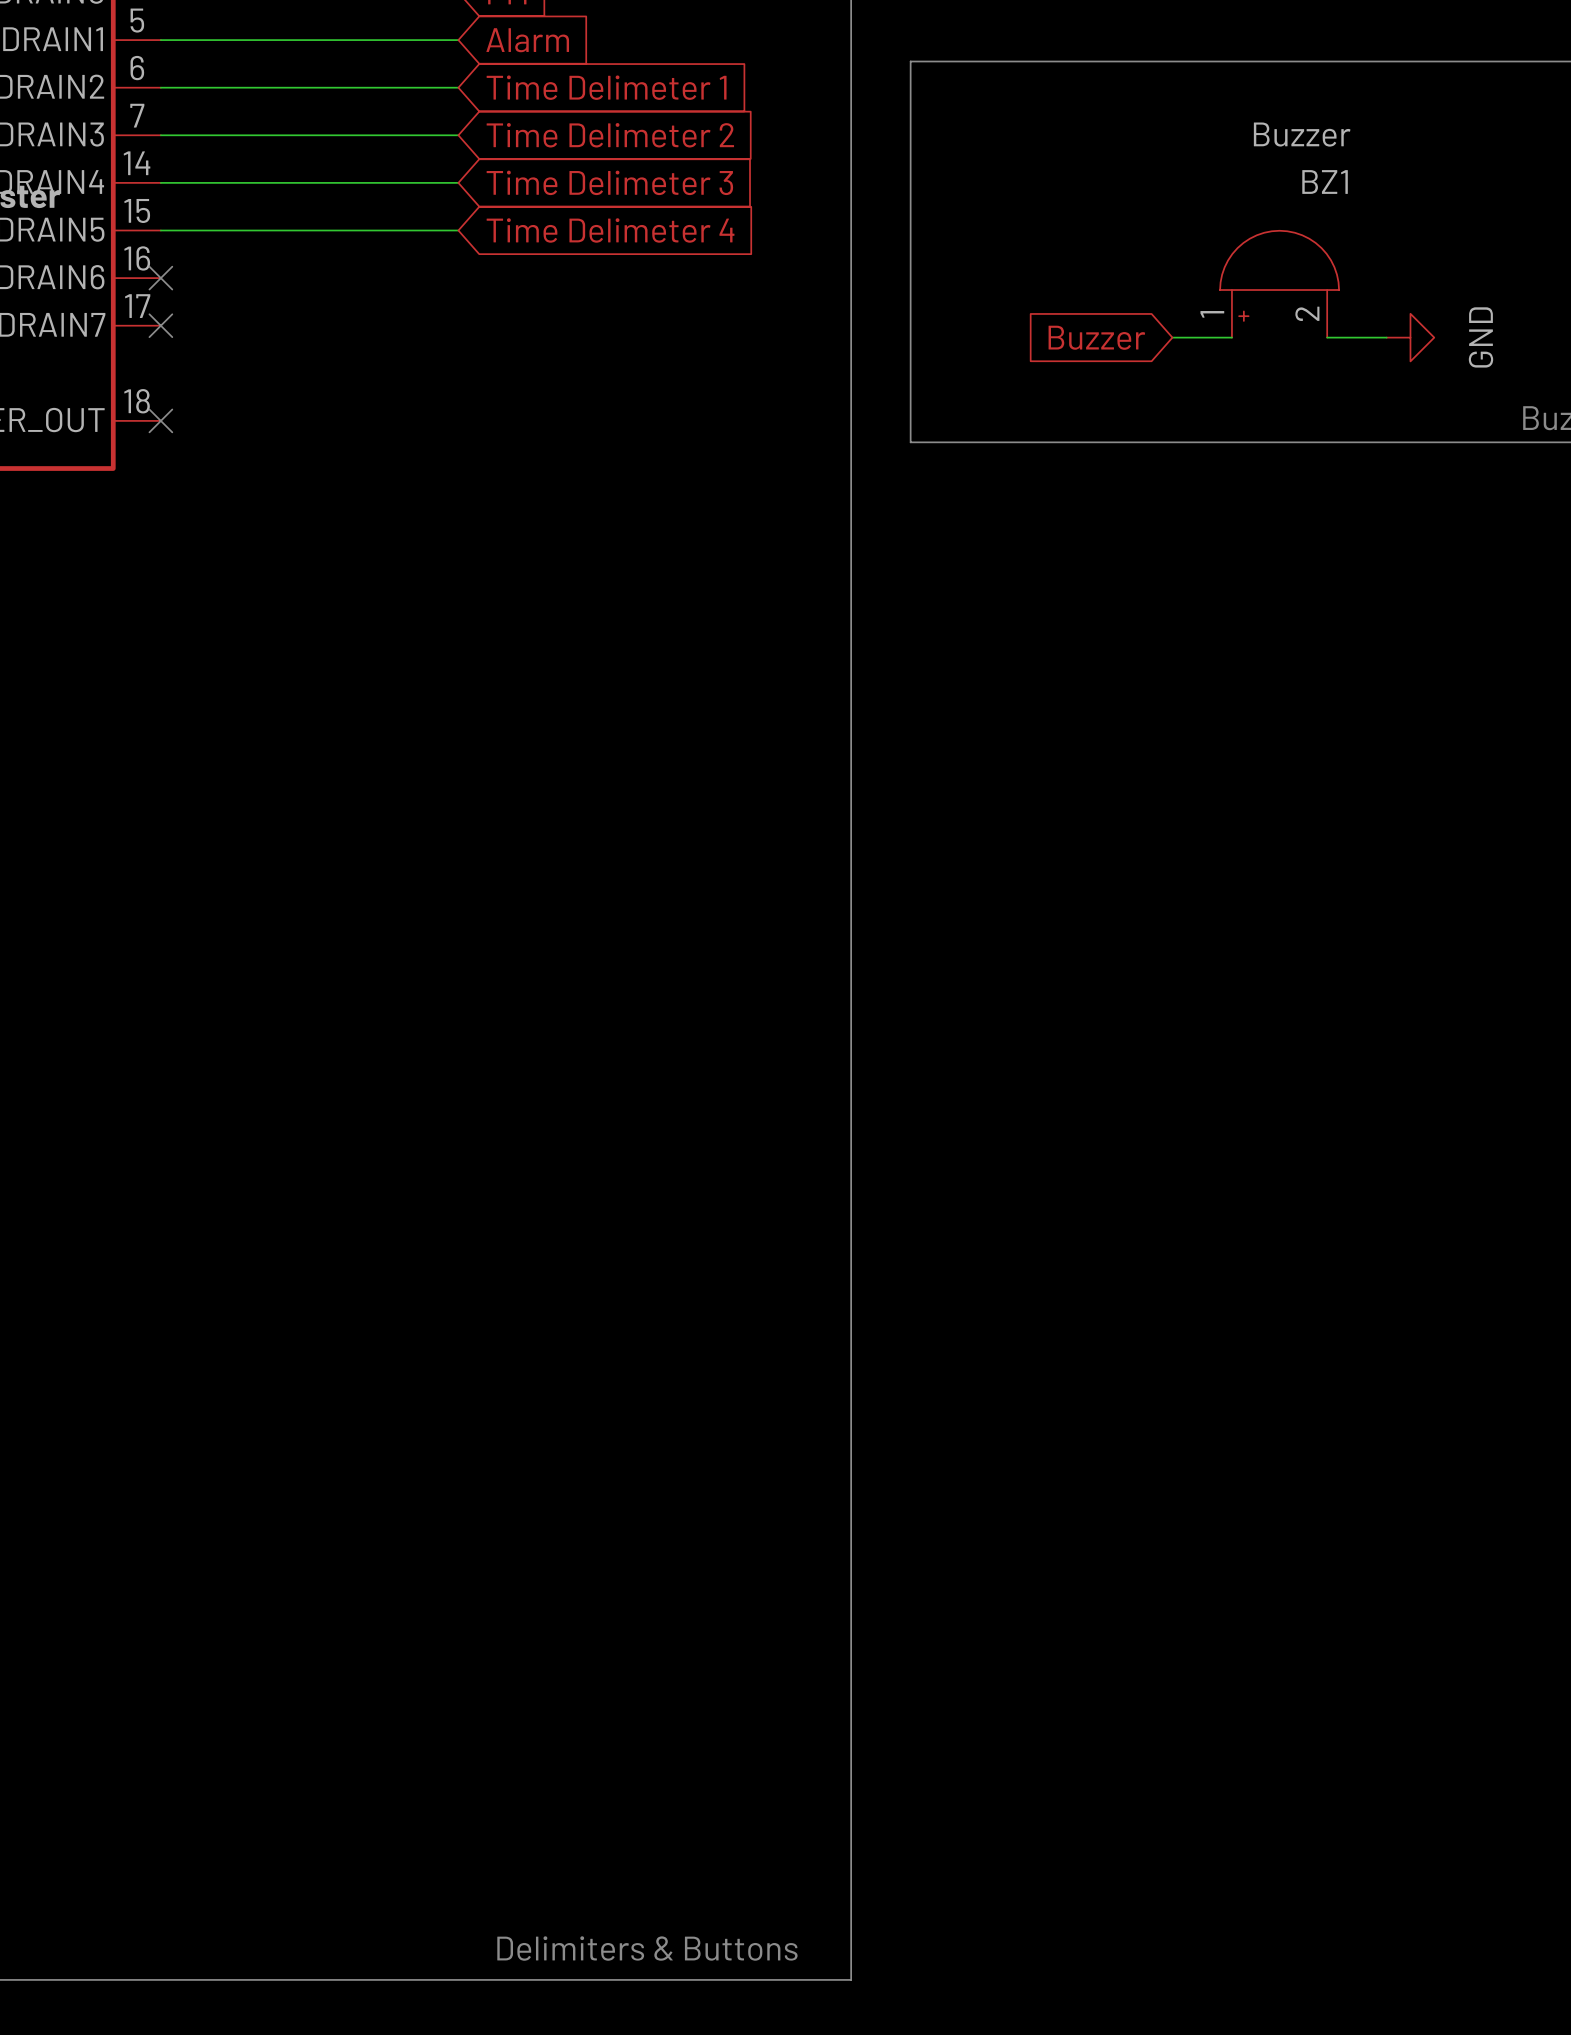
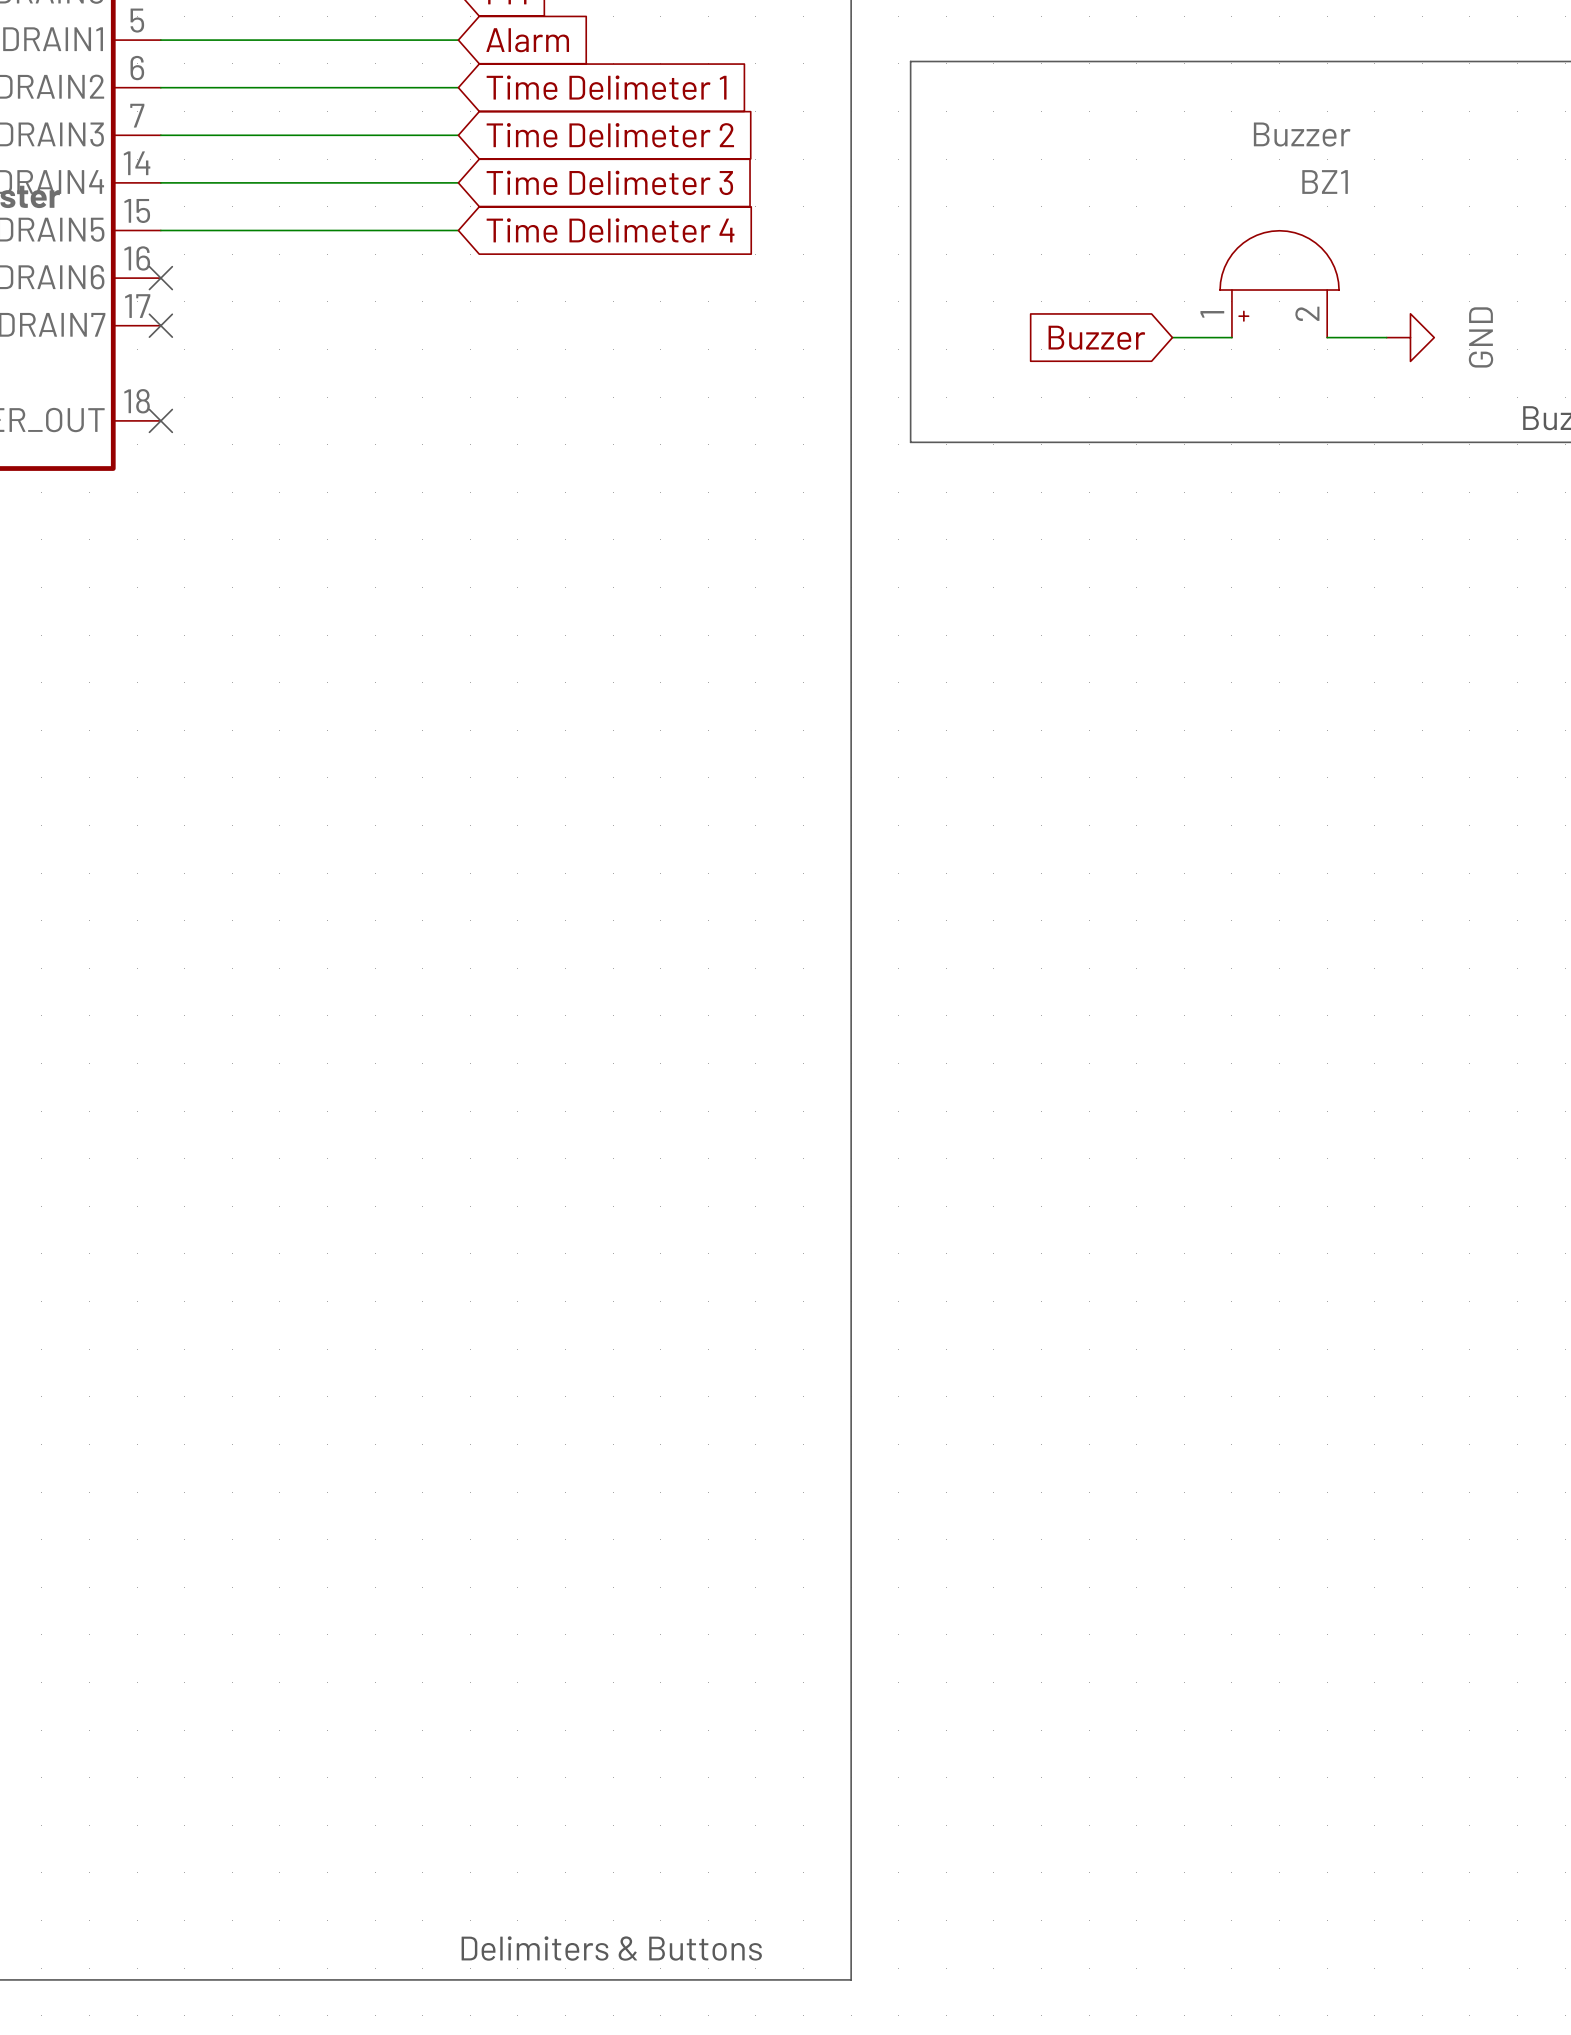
text position: Delimiters & Buttons (647, 1948) -> Delimiters & Buttons (611, 1948)

